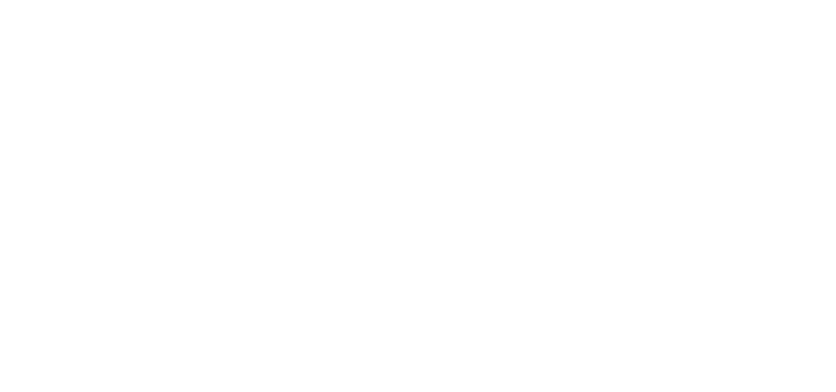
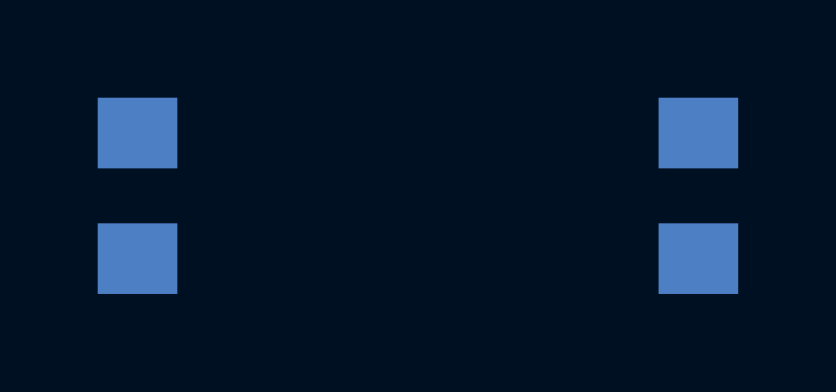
part: none -> (137, 195)
part: none -> (698, 195)

